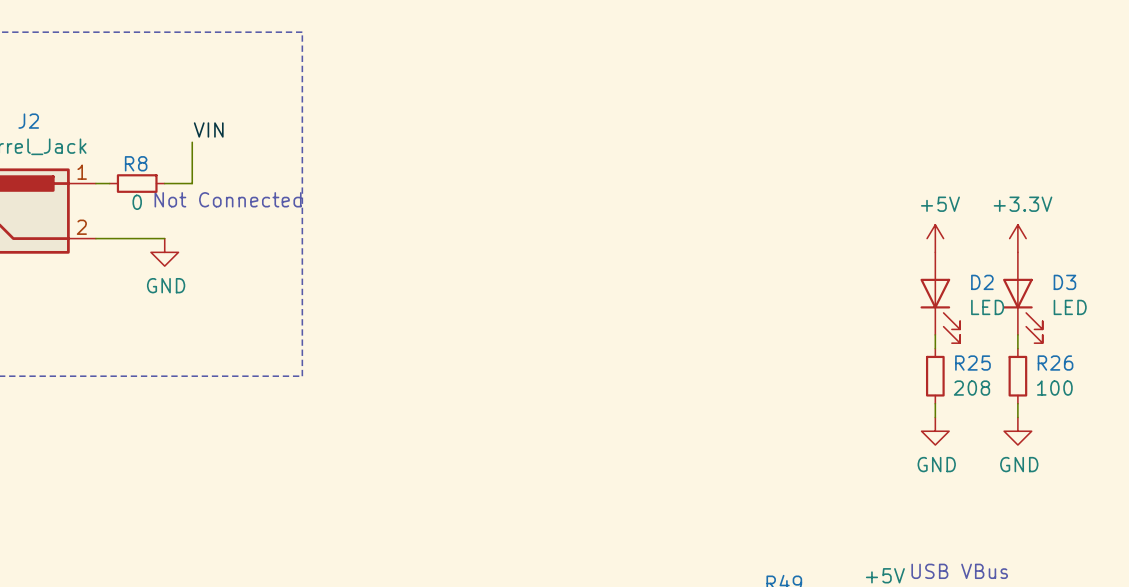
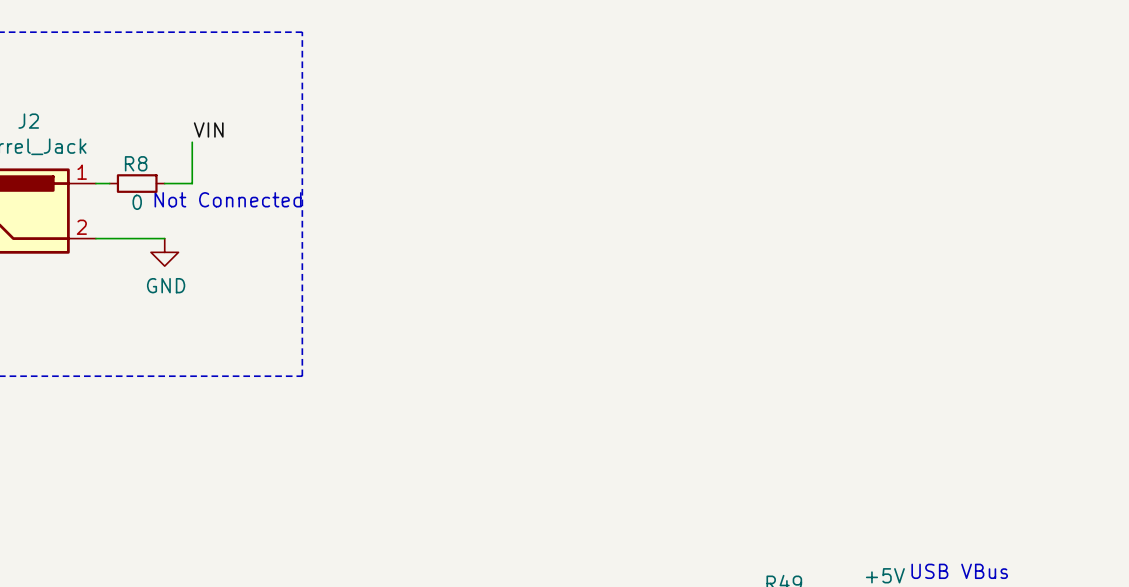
power symbol: +5V (935, 238) -> none
power symbol: +3.3V (1017, 238) -> none
D2: LED (940, 297) -> none
D3: LED (1022, 297) -> none
wire: (935, 334) (935, 348) -> none
wire: (1017, 334) (1017, 348) -> none
R25: 208 (935, 376) -> none
R26: 100 (1017, 376) -> none
wire: (935, 403) (935, 417) -> none
wire: (1017, 403) (1017, 417) -> none
power symbol: GND (935, 431) -> none
power symbol: GND (1017, 431) -> none

